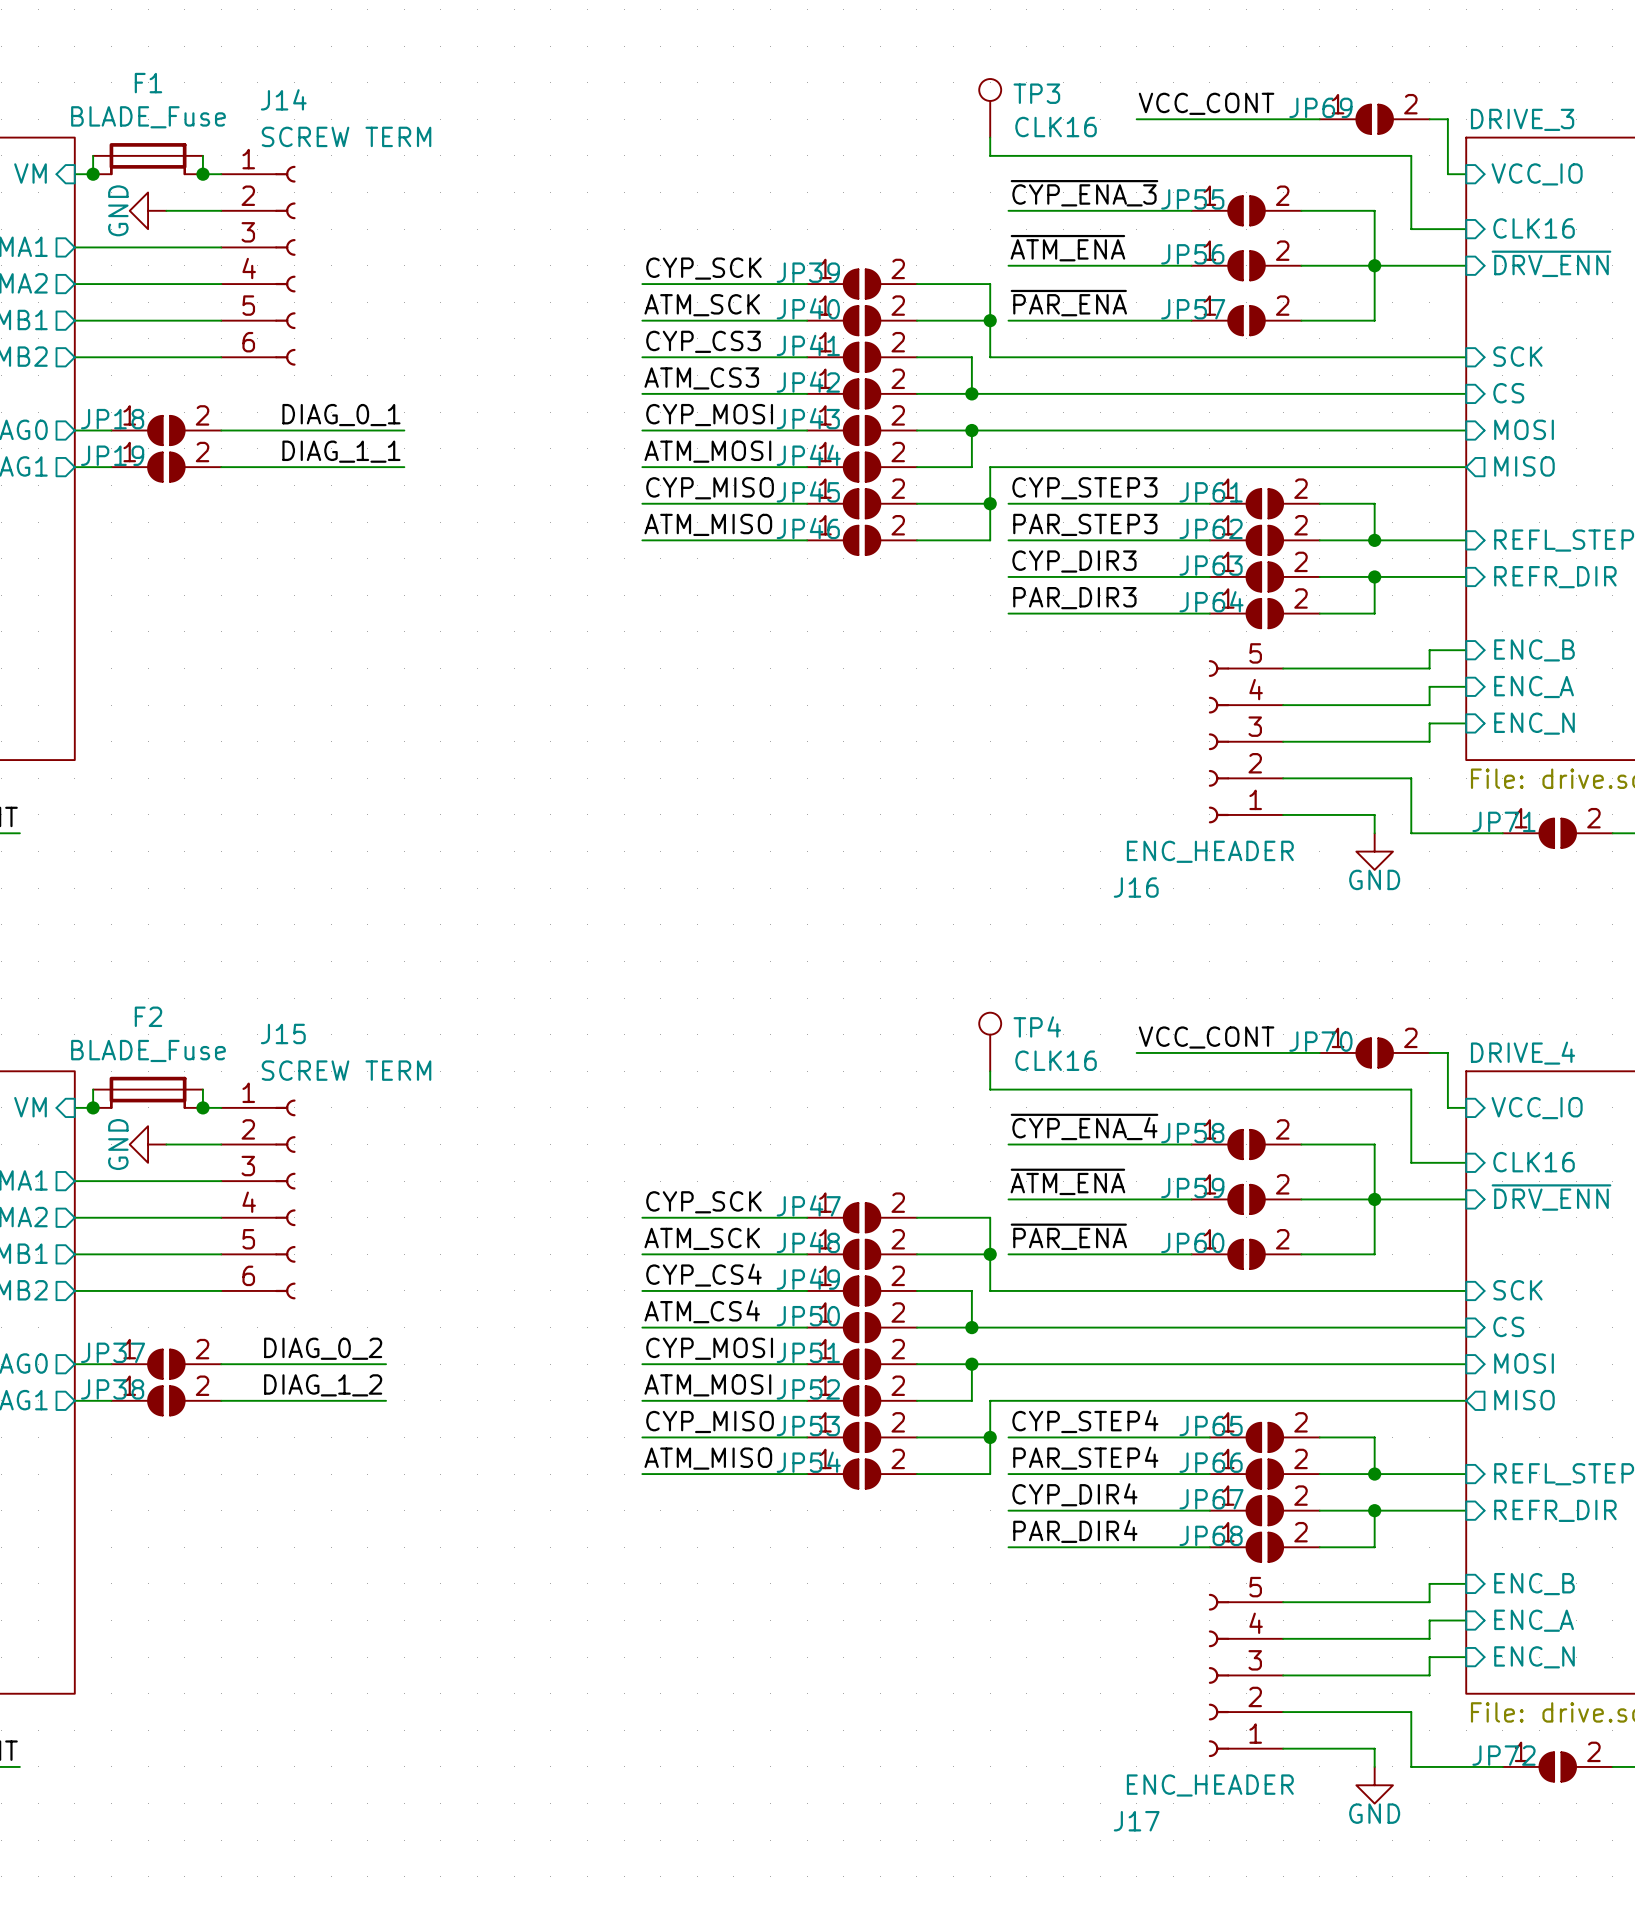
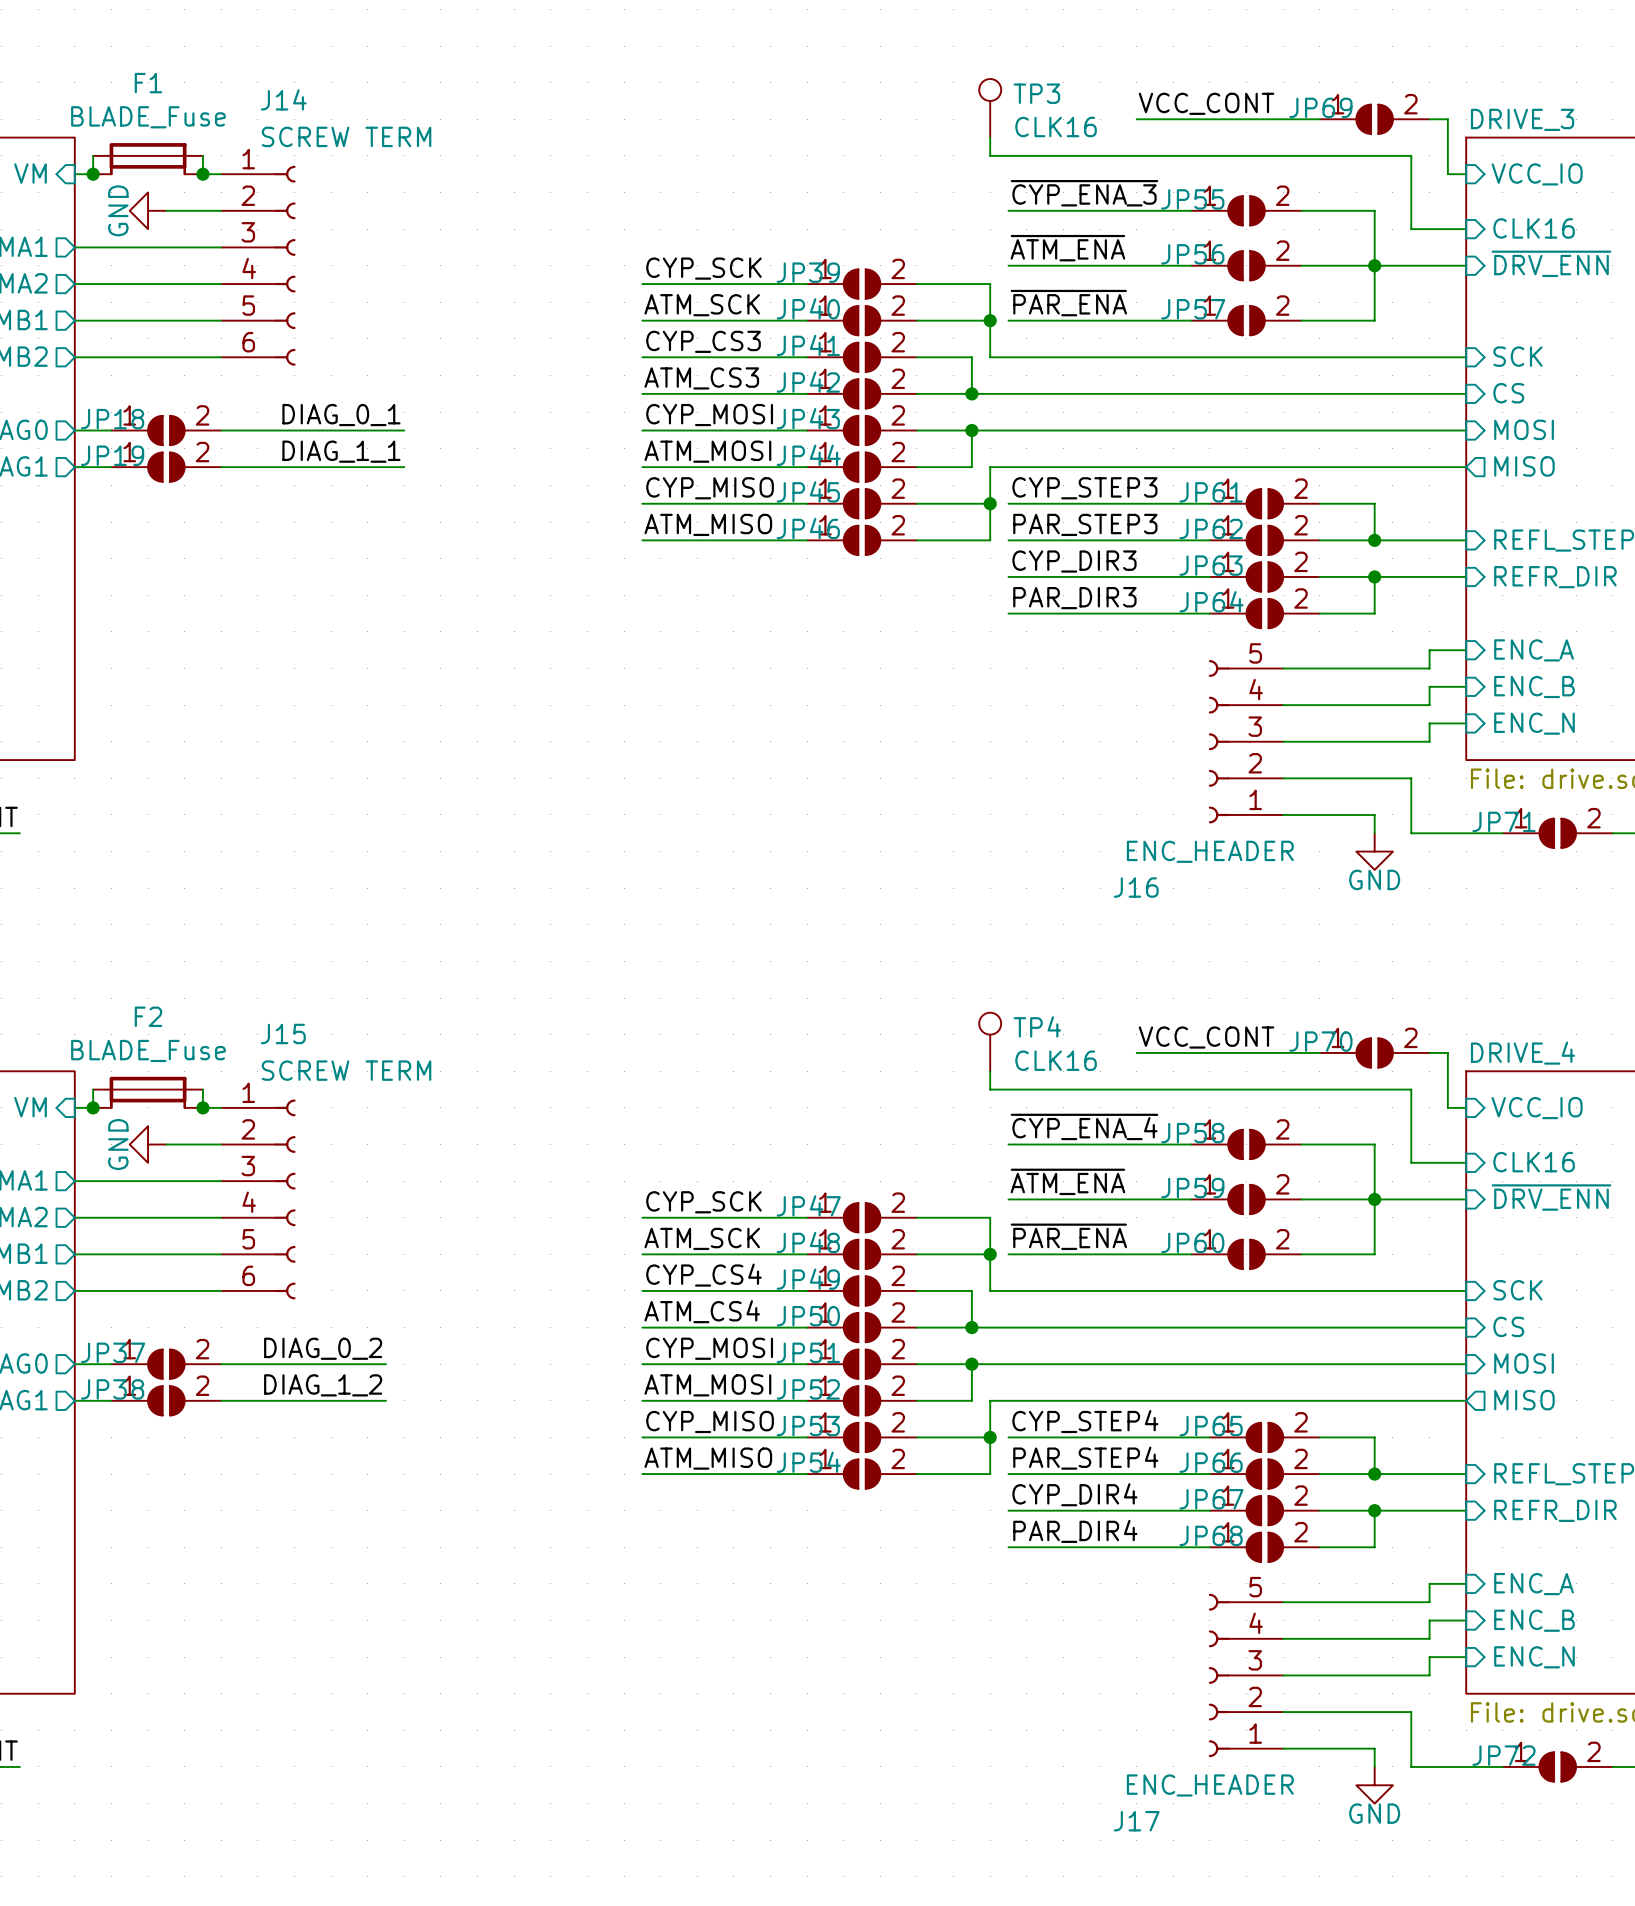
sheet pin: ENC_B (1534, 650) -> ENC_A (1534, 650)
sheet pin: ENC_A (1534, 687) -> ENC_B (1534, 687)
sheet pin: ENC_B (1534, 1584) -> ENC_A (1534, 1584)
sheet pin: ENC_A (1534, 1620) -> ENC_B (1534, 1620)

